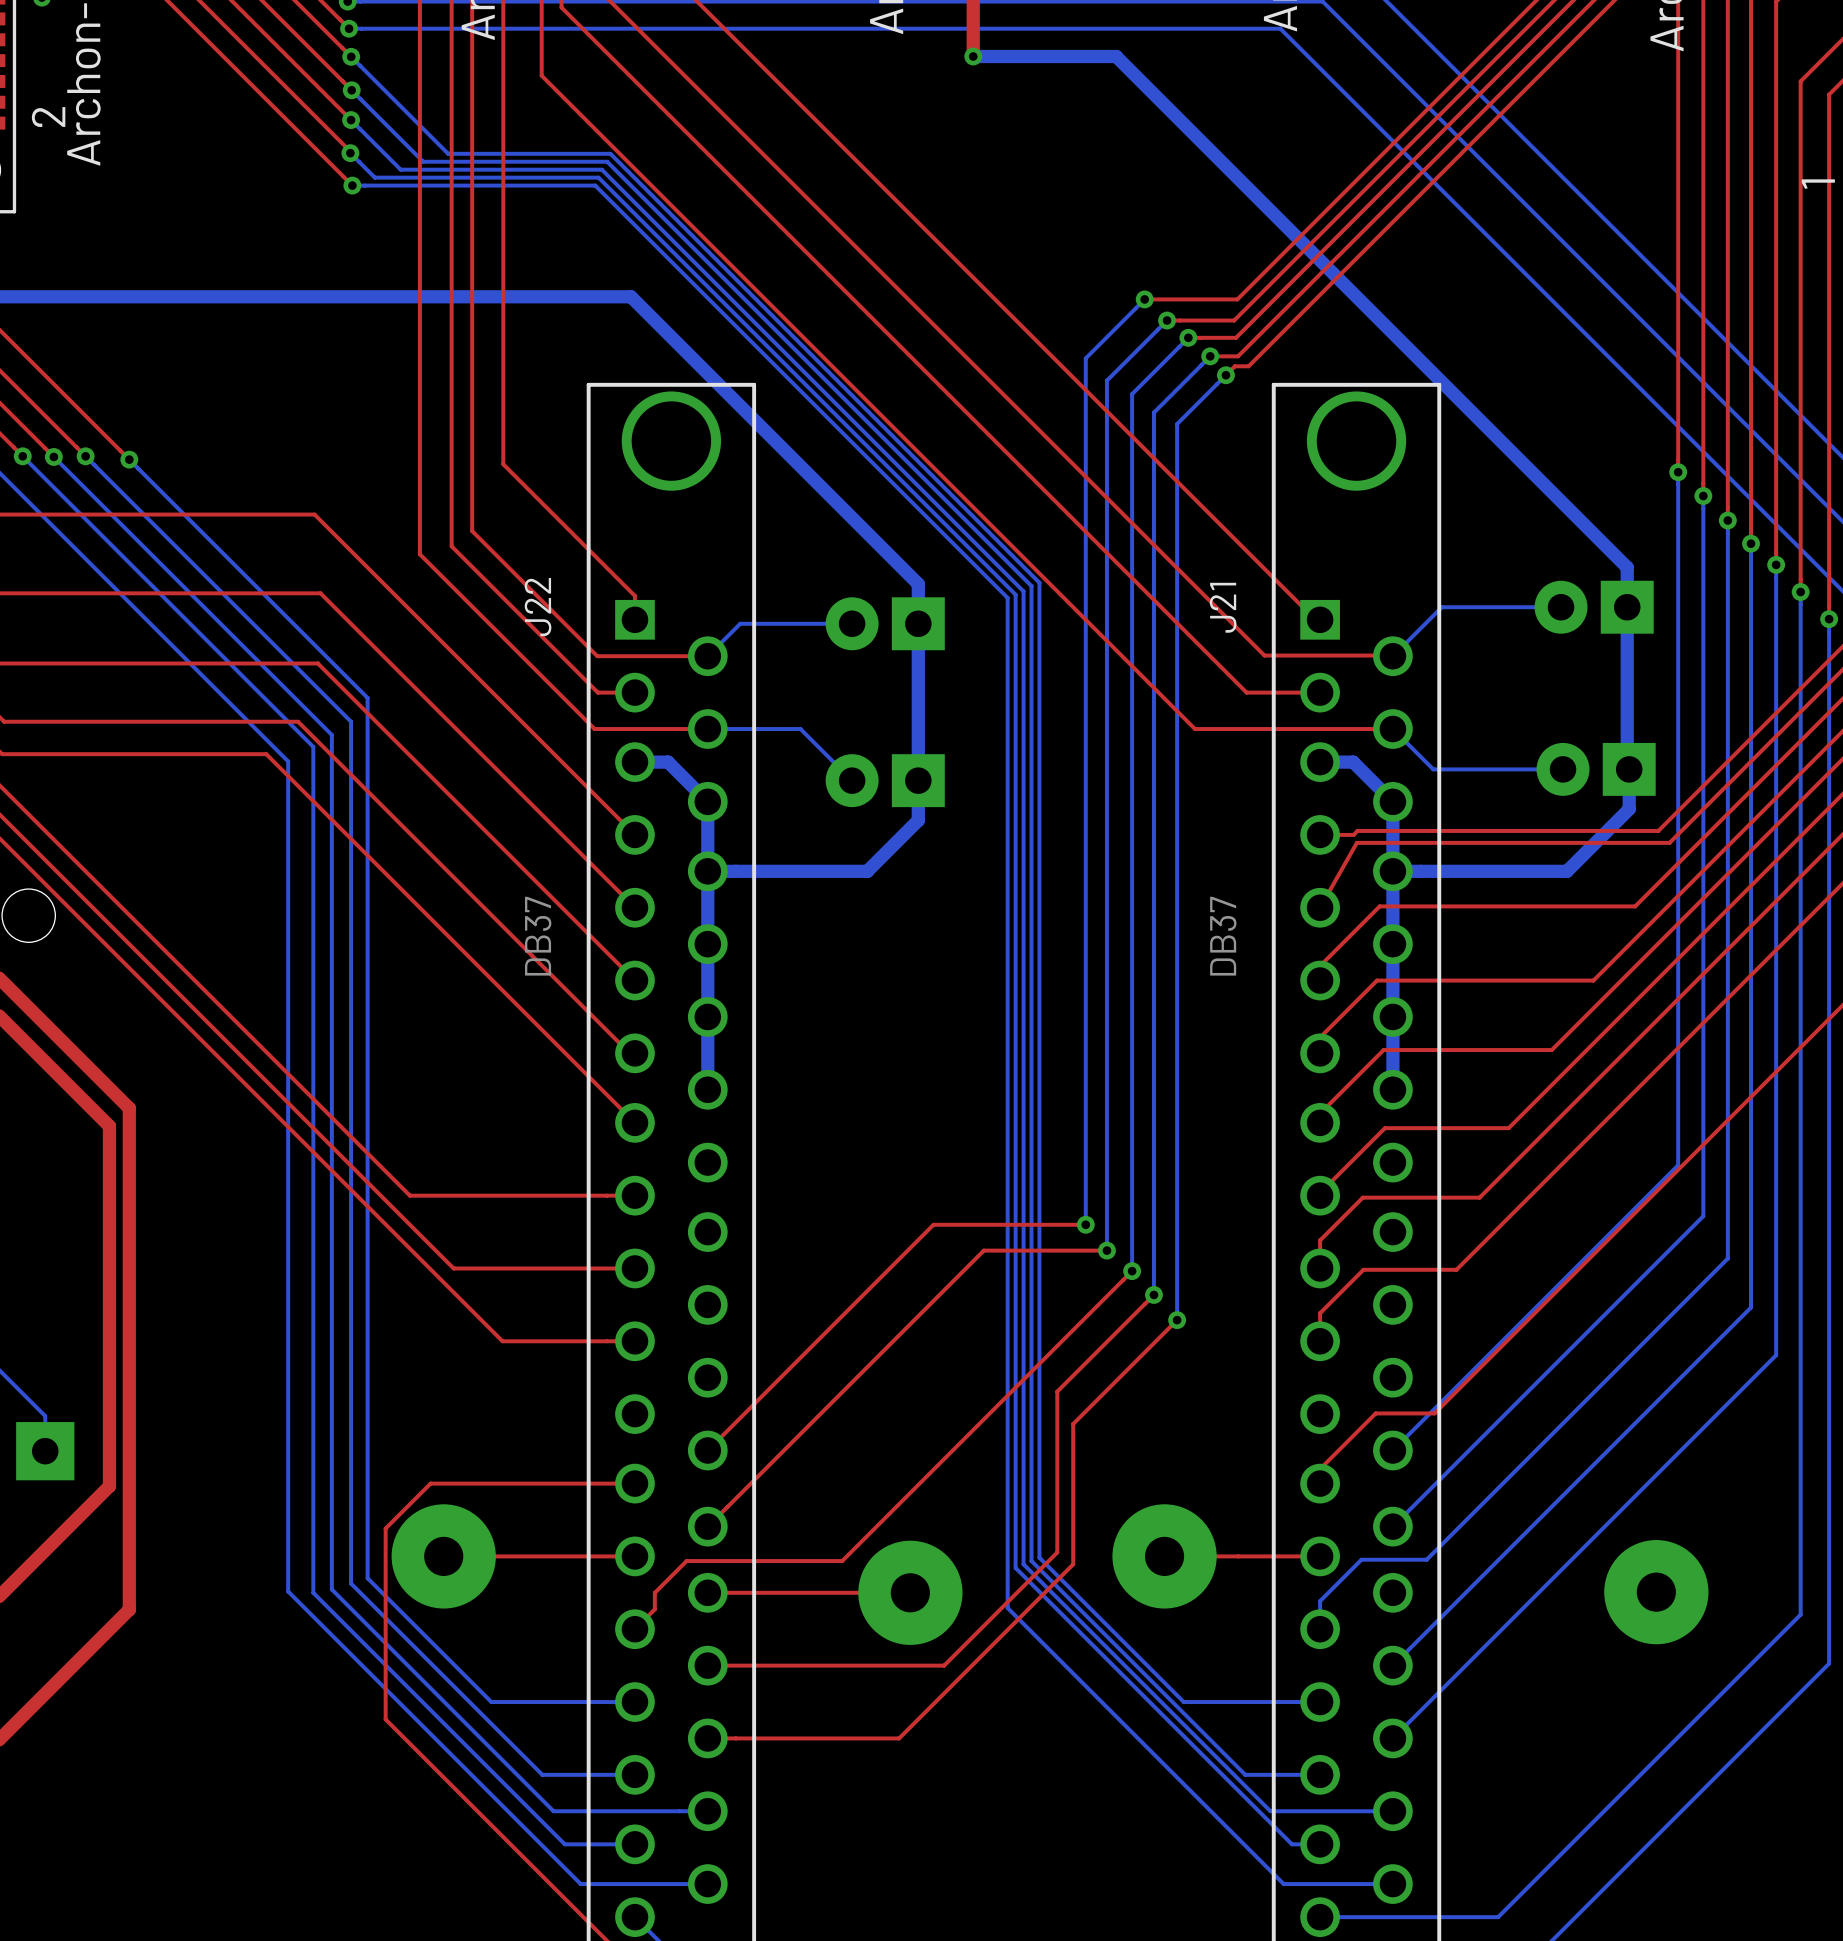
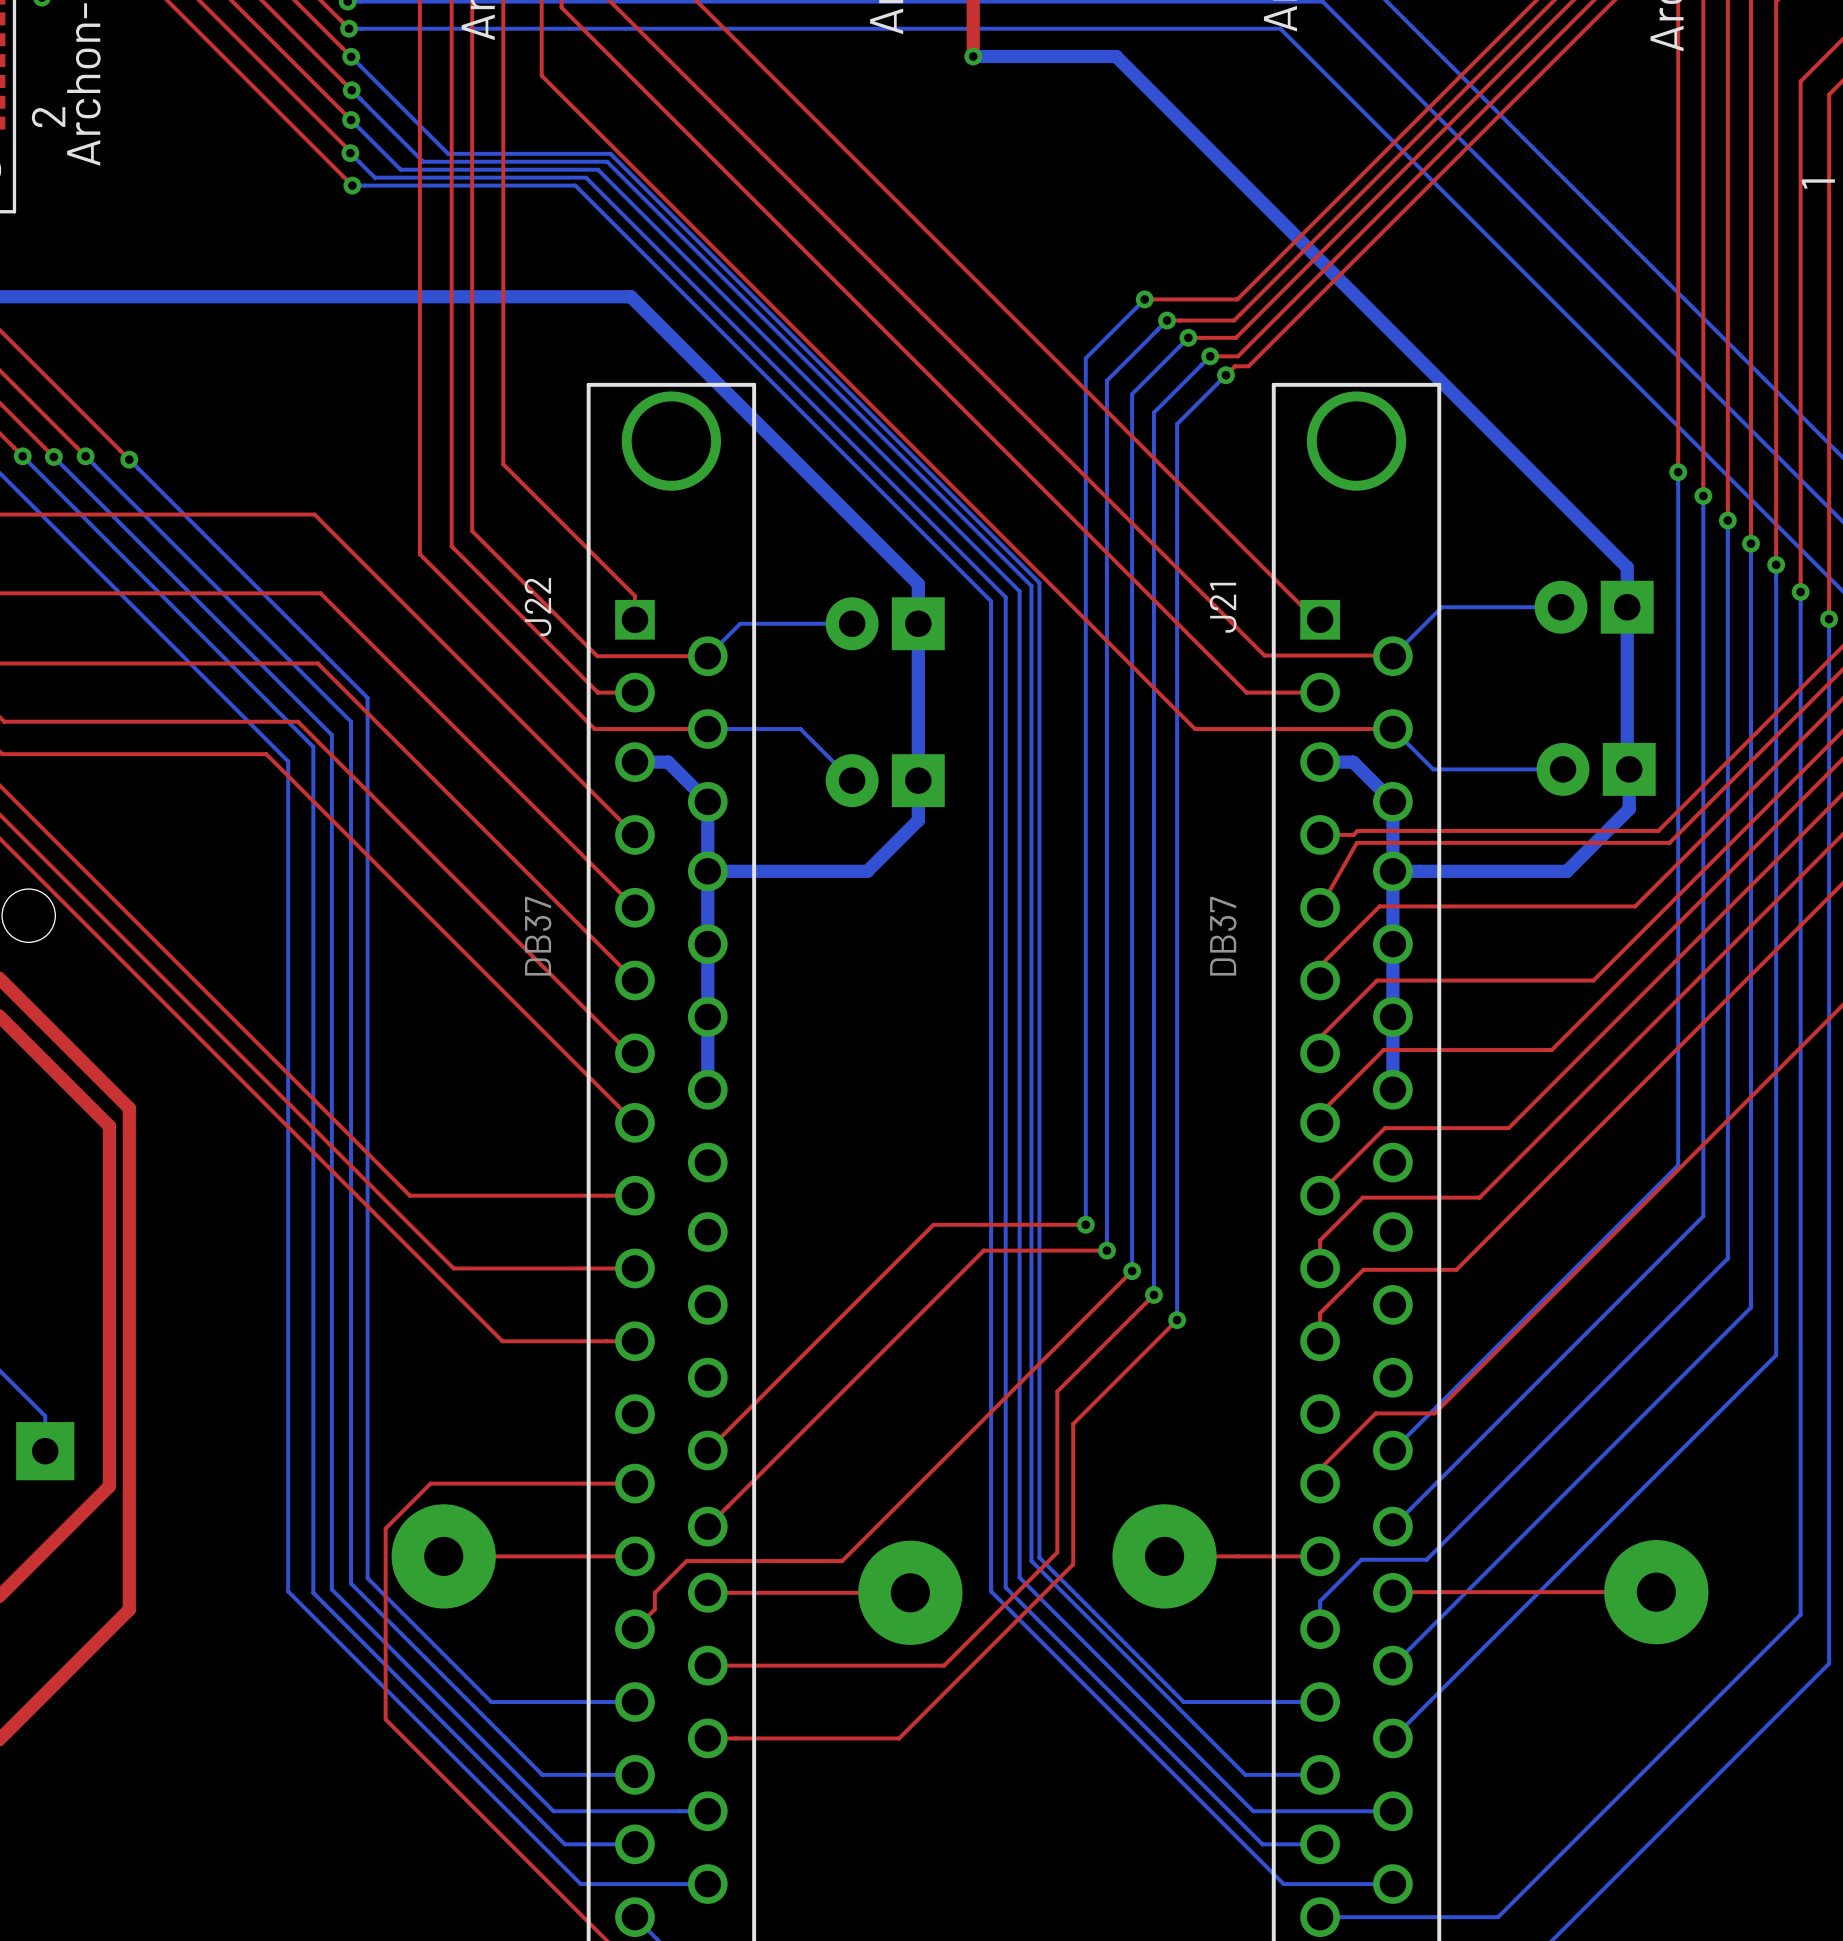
bottom track: (597, 169) (601, 169) (1023, 591) (1023, 1564) (1270, 1811) -> (597, 169) (1019, 591) (1019, 1577) (1253, 1811) (1270, 1811)
bottom track: (586, 177) (598, 177) (1015, 594) (1015, 1567) (1292, 1844) -> (586, 177) (1005, 597) (1005, 1587) (1262, 1844) (1292, 1844)
bottom track: (575, 185) (595, 185) (1007, 597) (1007, 1608) -> (575, 185) (991, 601) (991, 1591) (1007, 1608)
top track: none -> (1656, 1592) (1392, 1592)

